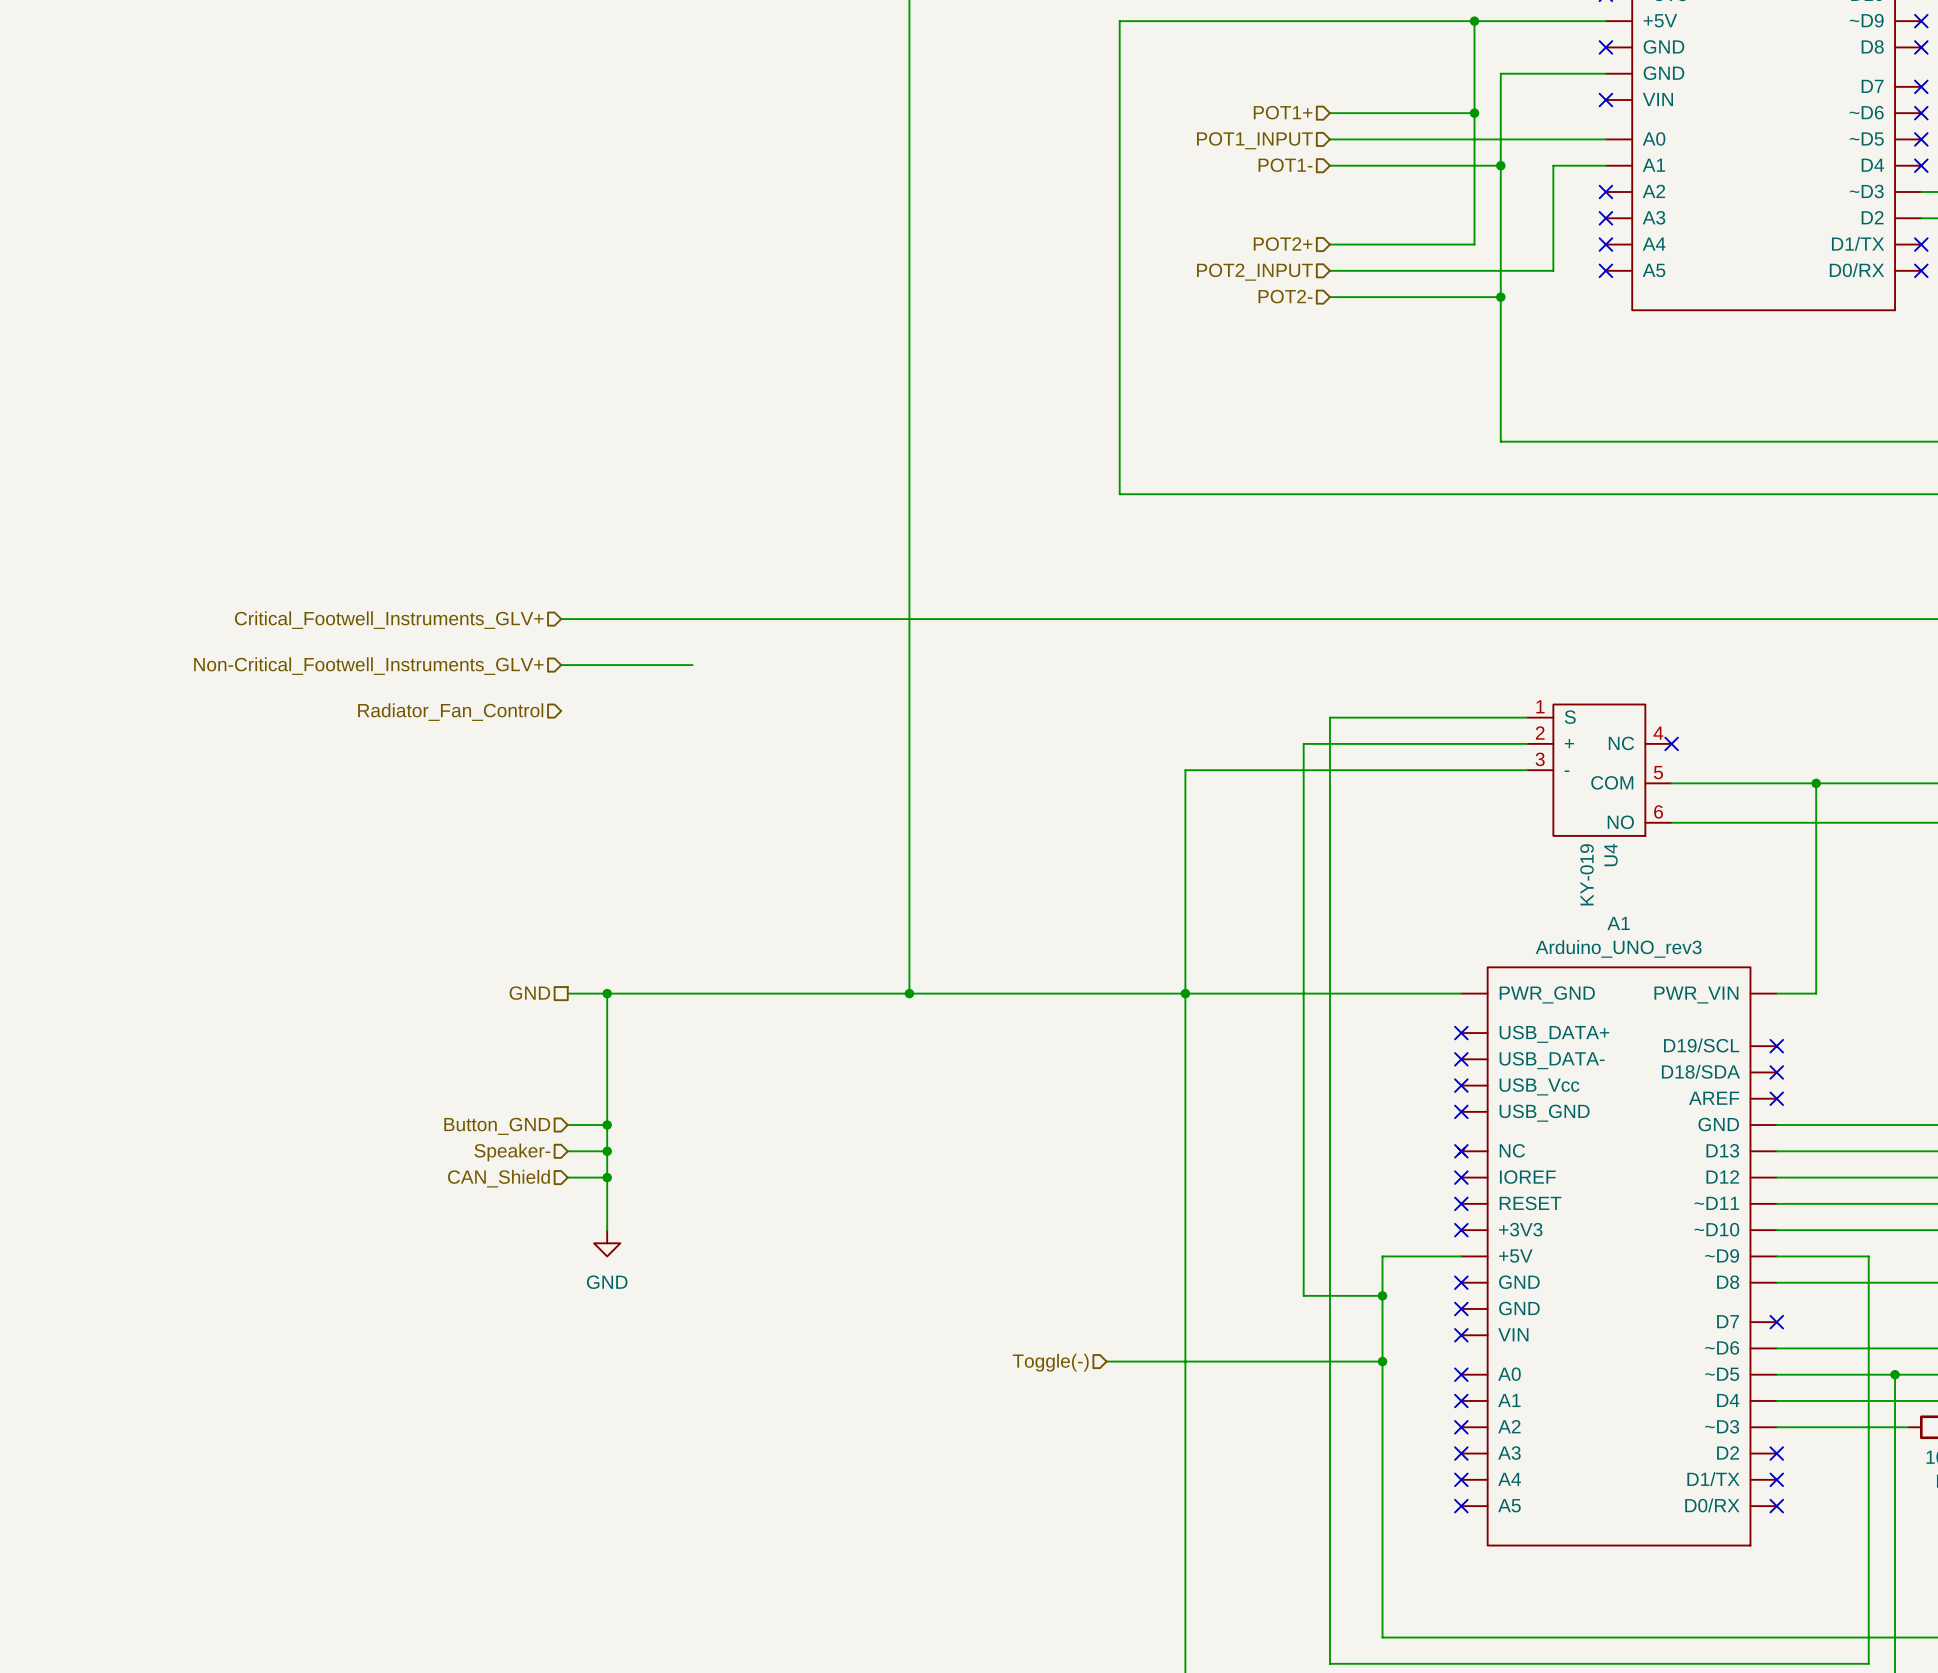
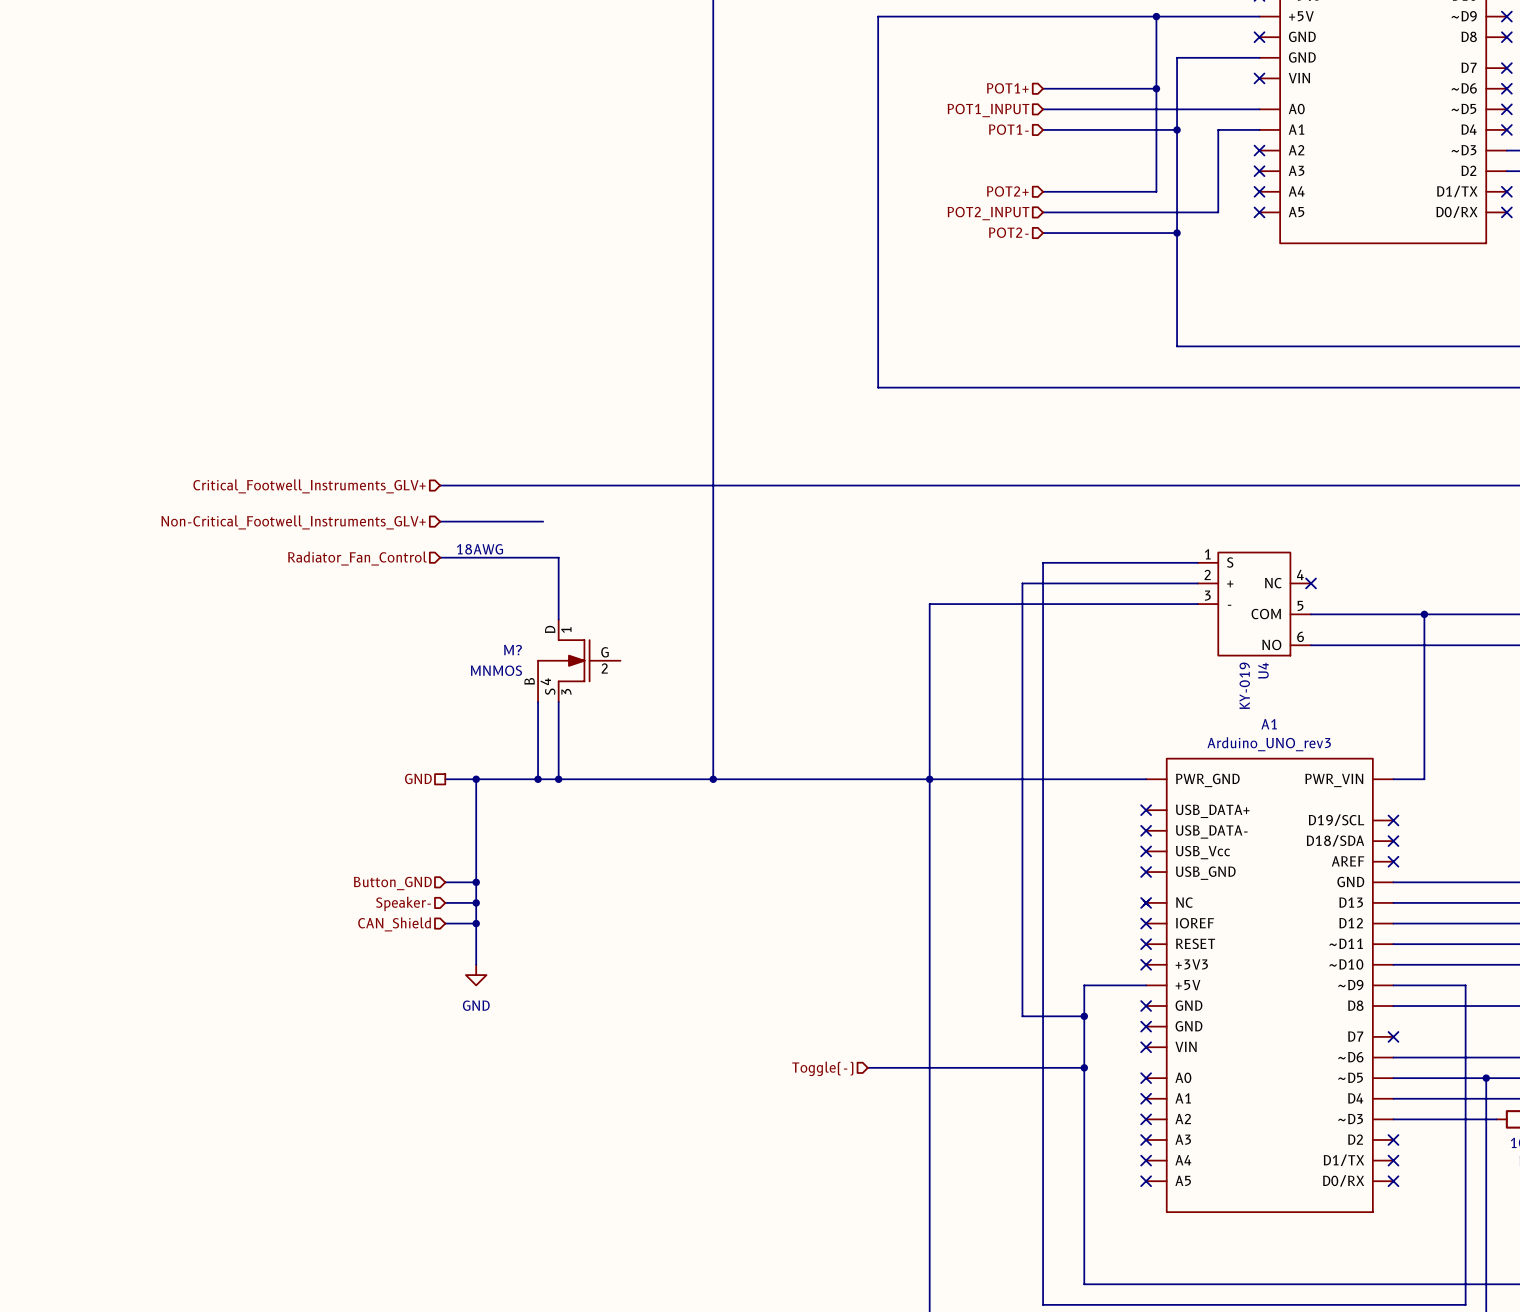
text: none -> 18AWG (479, 549)
wire: none -> (440, 557) (558, 557) (558, 619)
M?: none -> MNMOS (579, 660)
wire: none -> (538, 701) (538, 779)
wire: none -> (558, 701) (558, 779)
junction: none -> (538, 779)
junction: none -> (558, 779)

